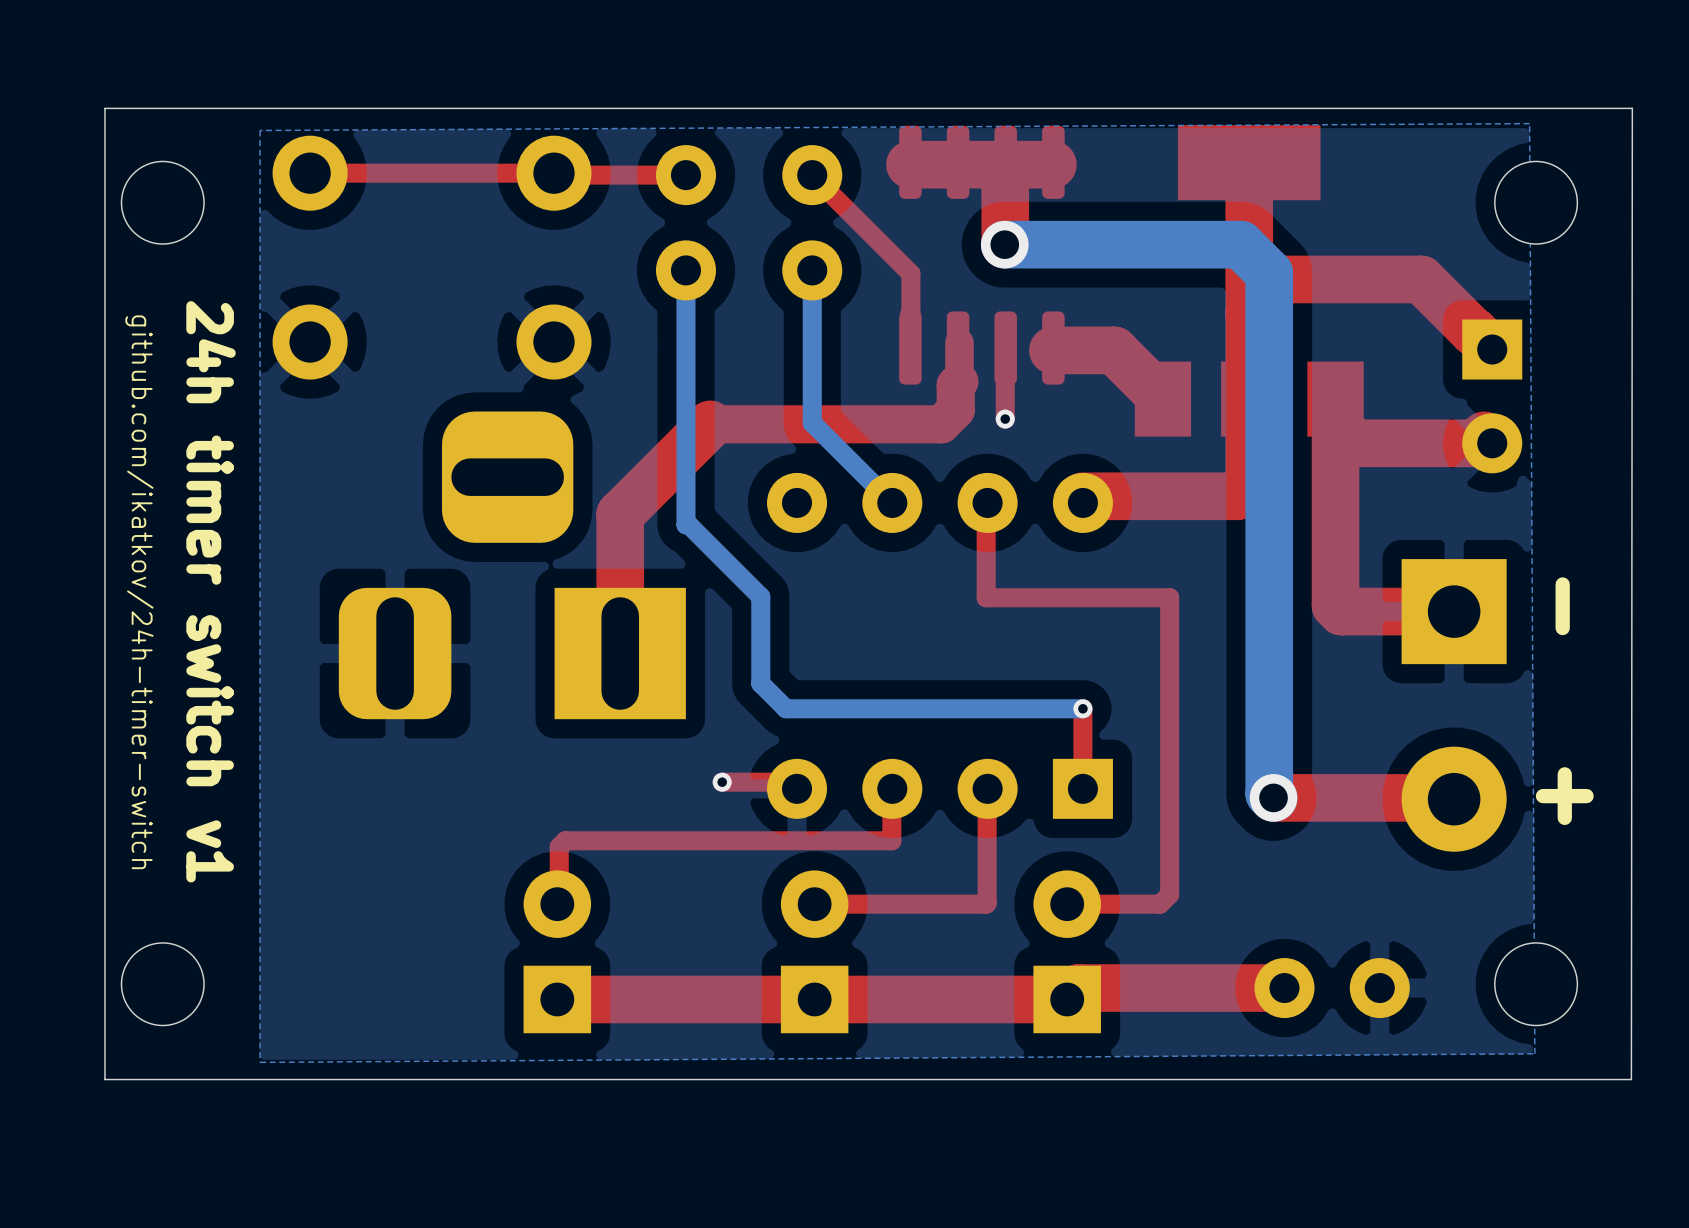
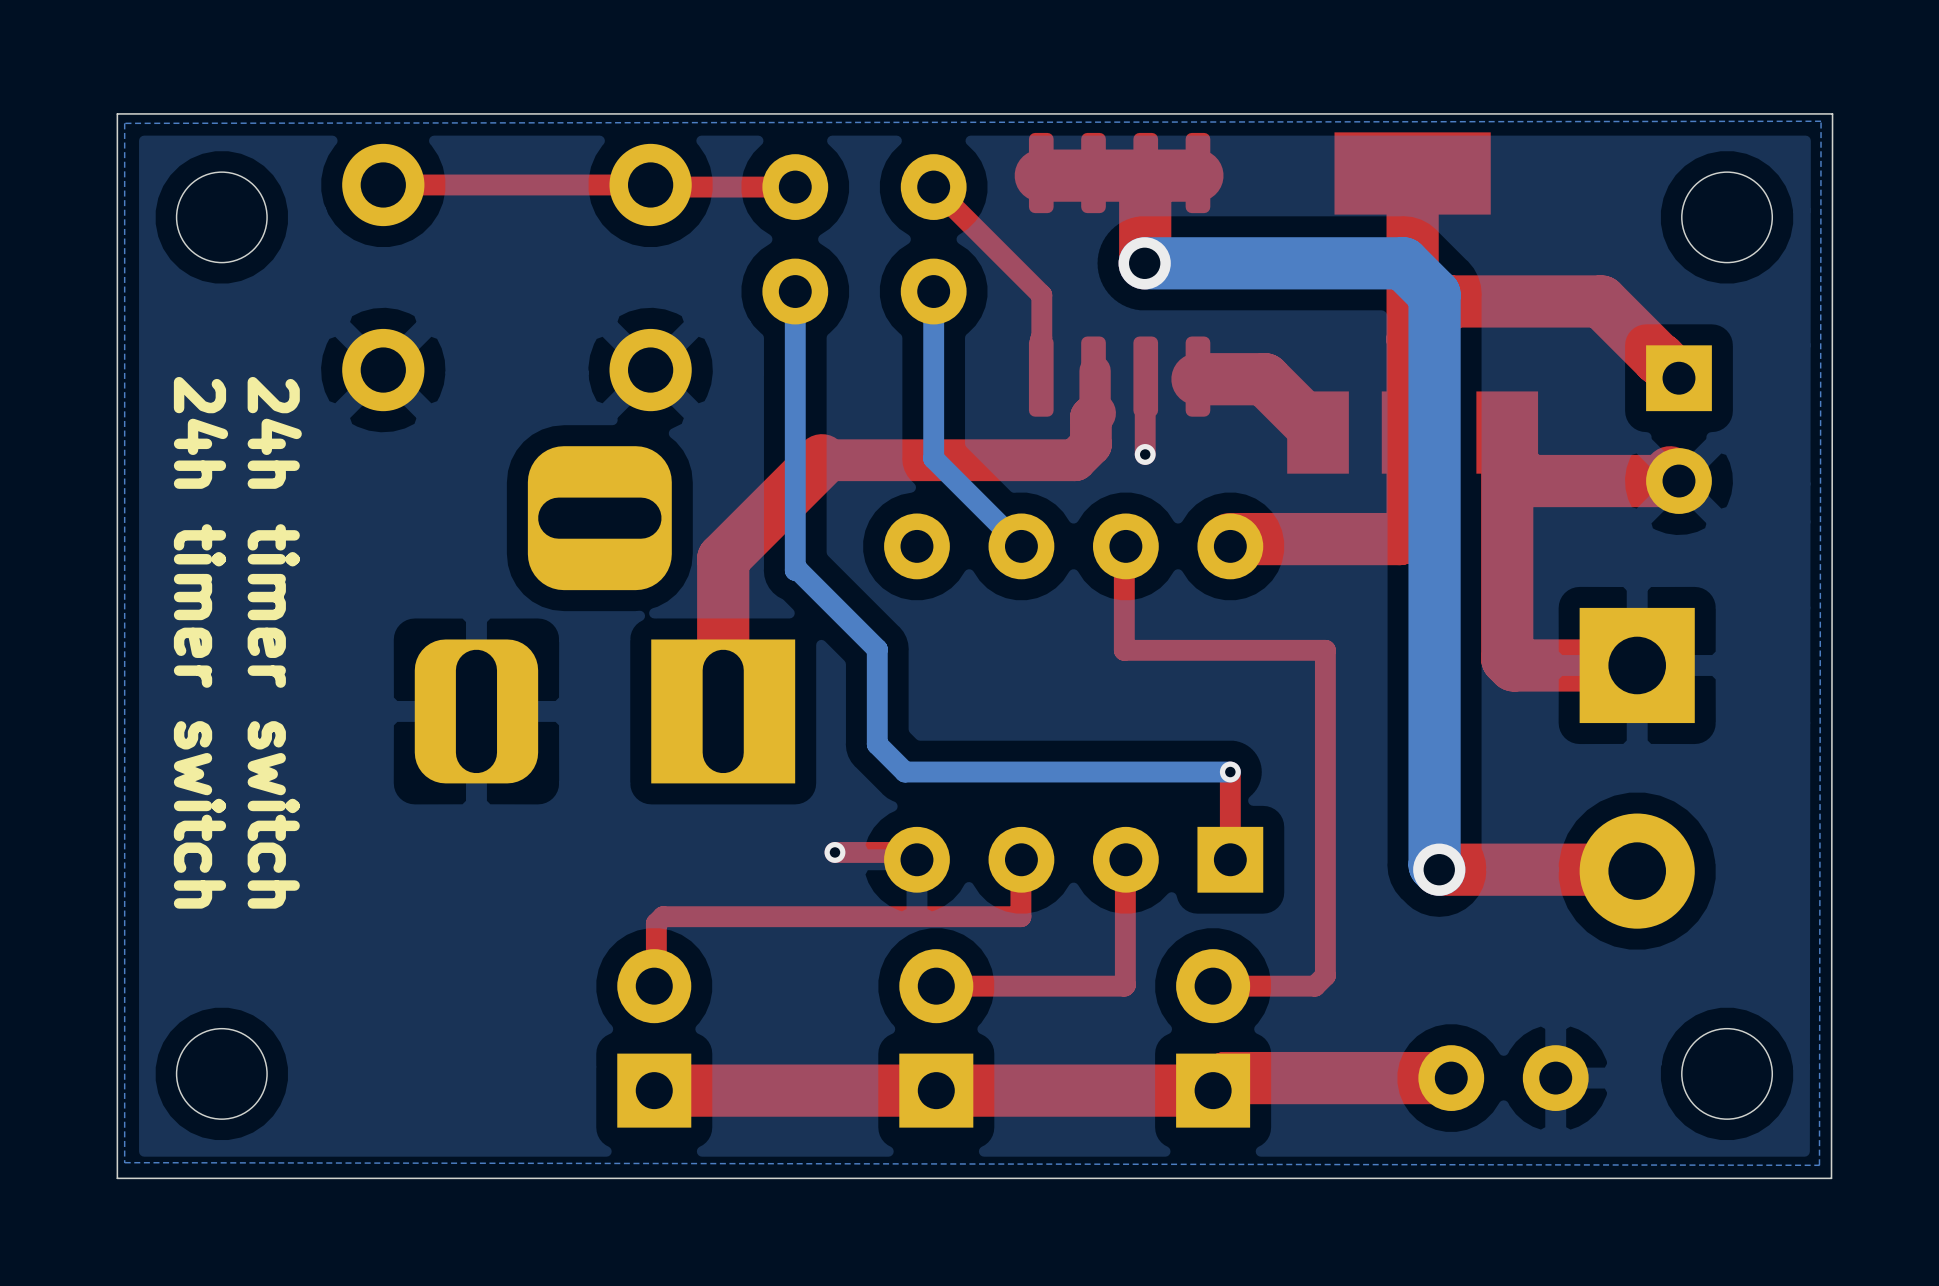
board edge: (104, 108) (104, 1079) -> (158, 113) (117, 113) (117, 1178) (158, 1178)
bottom zone outline: (1529, 123) (1534, 1053) (260, 1062) (260, 130) (1529, 123) -> (1821, 121) (1819, 1165) (124, 1162) (124, 123) (1821, 121)
text: 24h timer switch v1 (211, 591) -> 24h timer switch (274, 642)
text: github.com/ikatkov/24h-timer-switch (139, 592) -> 24h timer switch (200, 642)
text: - (1562, 606) -> none
text: + (1564, 796) -> none

